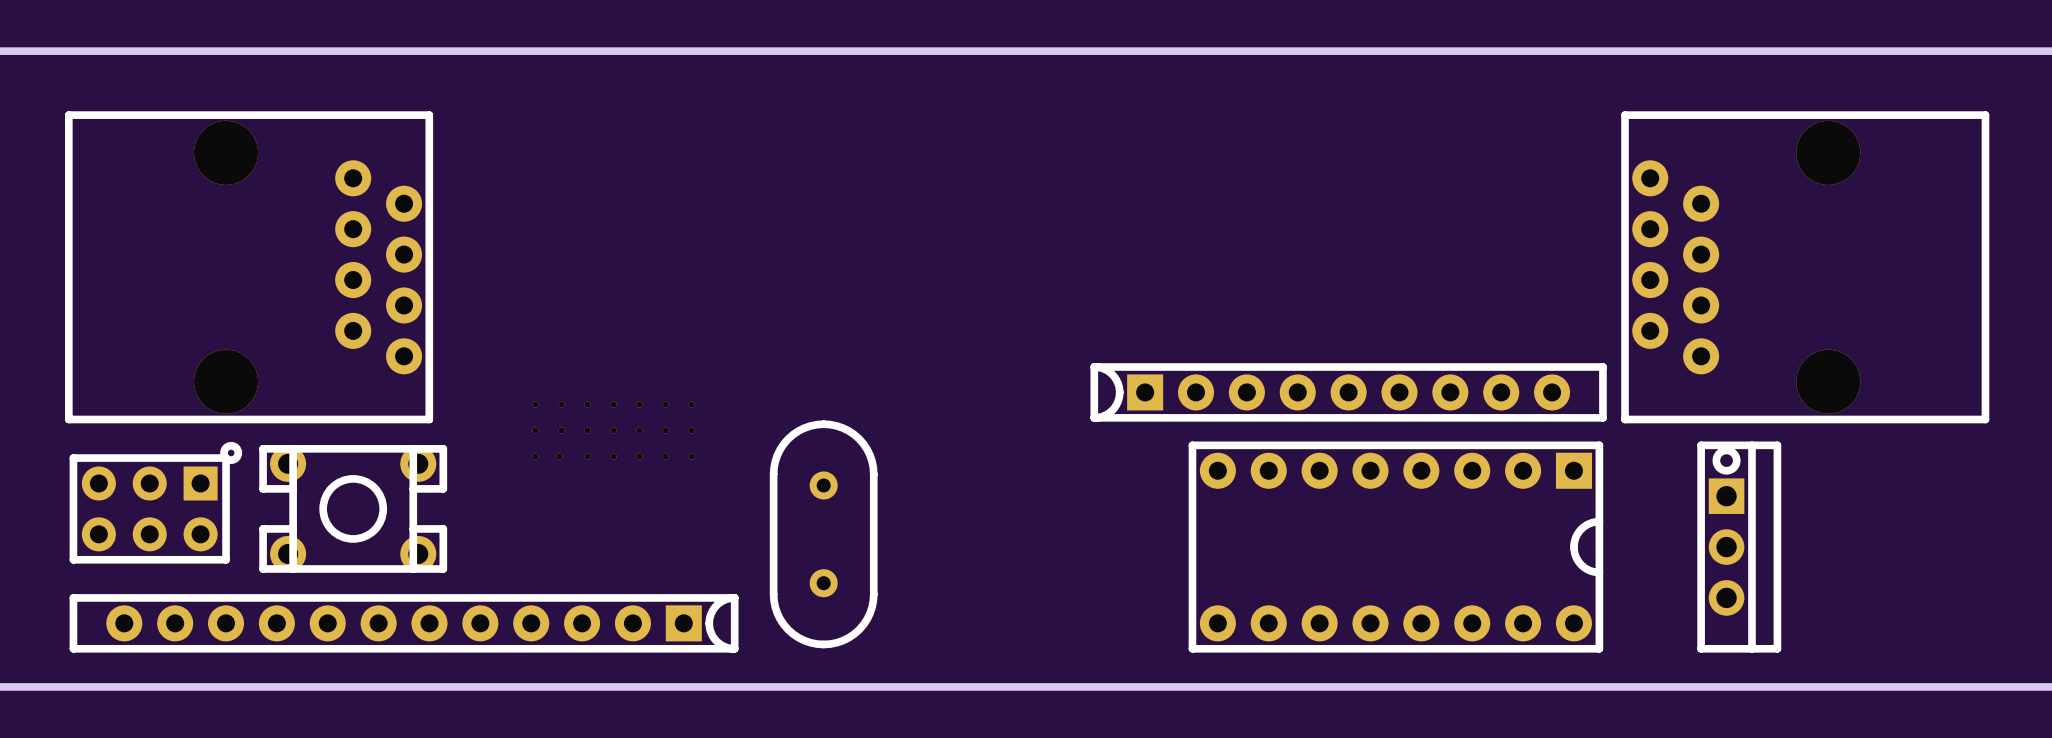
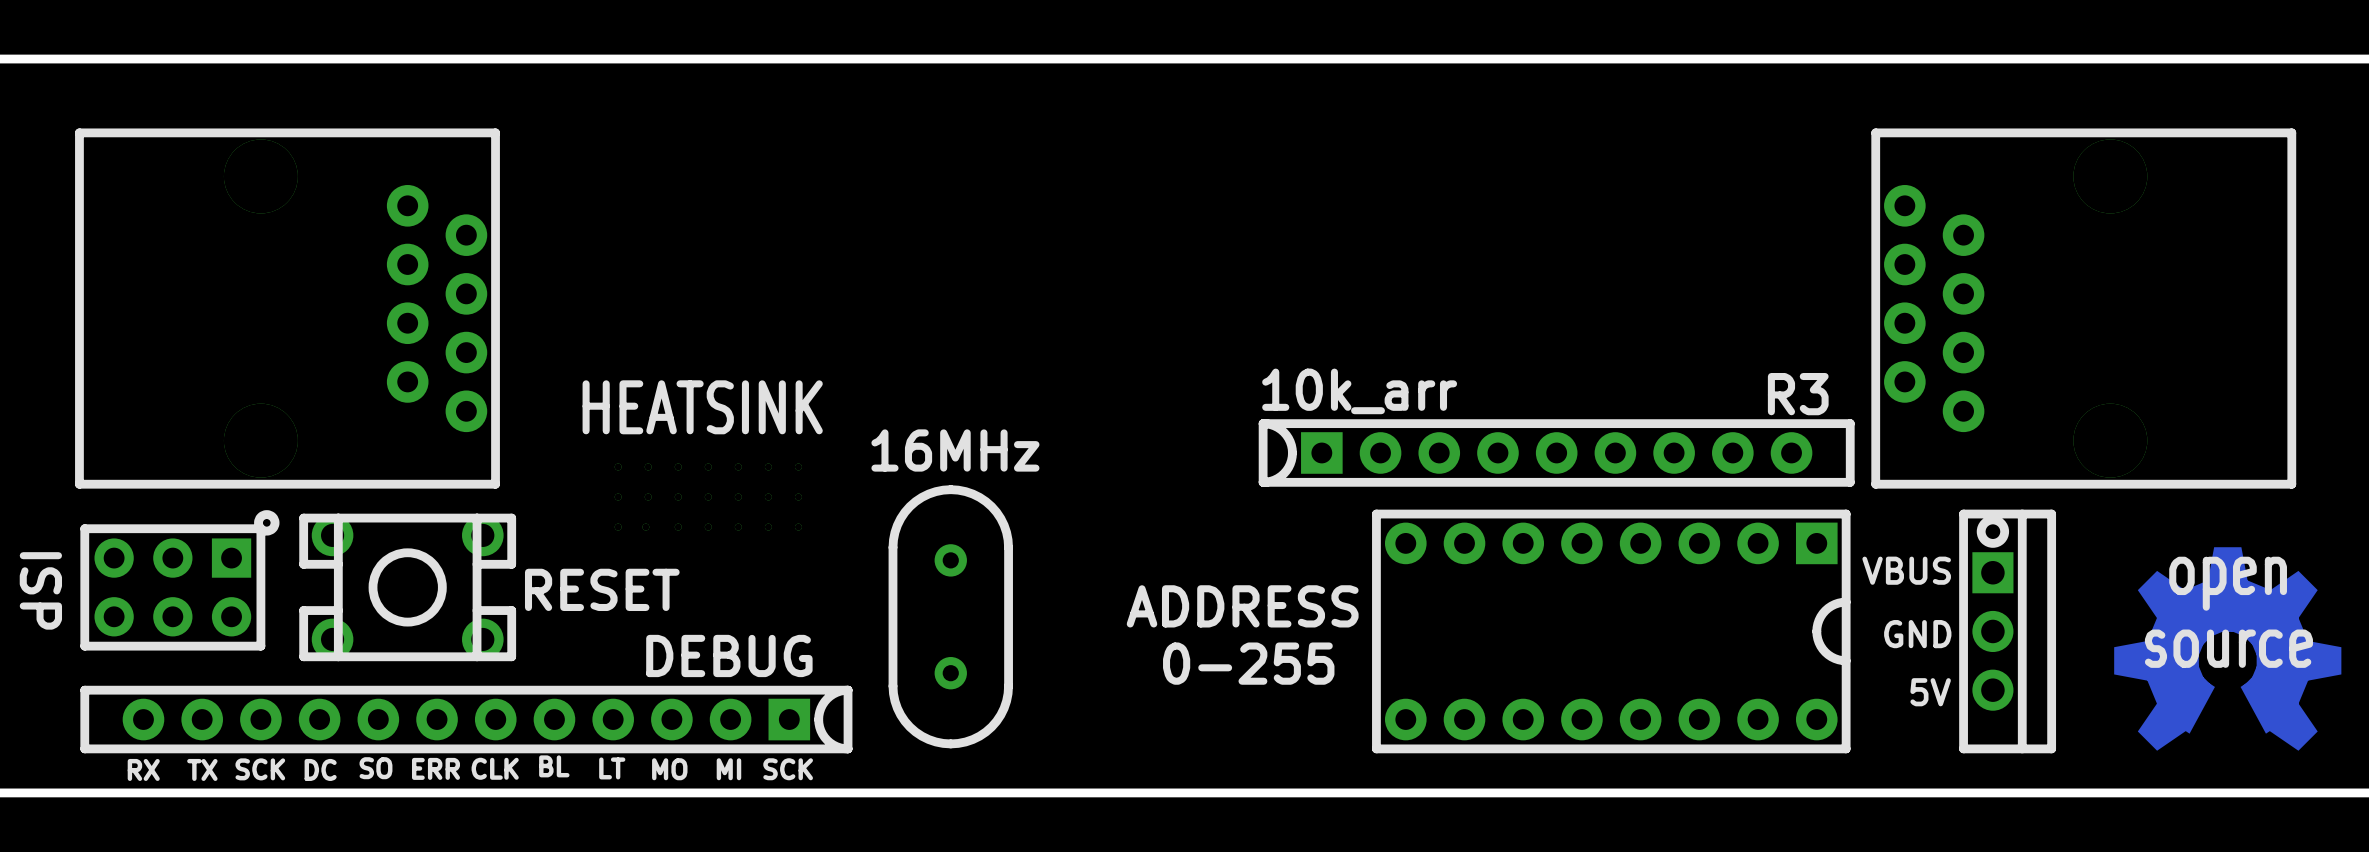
R3 value: none -> 10k_arr (1359, 391)
R3 name: none -> R3 (1798, 394)
text: none -> HEATSINK (702, 407)
part value: none -> 16MHz (955, 450)
text: none -> VBUS (1906, 570)
text: none -> open (2228, 583)
part value: none -> ISP (40, 590)
part value: none -> RESET (602, 589)
part value: none -> ADDRESS (1242, 606)
text: none -> GND (1917, 634)
text: none -> source (2228, 648)
part: none -> (2227, 648)
part value: none -> DEBUG (729, 655)
text: none -> 0-255 (1248, 663)
text: none -> 5V (1930, 692)
text: none -> BL (554, 766)
text: none -> SO (375, 768)
text: none -> LT (612, 768)
text: none -> SCK (260, 769)
text: none -> ERR (435, 768)
text: none -> CLK (495, 768)
text: none -> MO (669, 769)
text: none -> MI (728, 769)
text: none -> SCK (788, 769)
text: none -> RX (143, 769)
text: none -> TX (202, 769)
text: none -> DC (320, 769)

